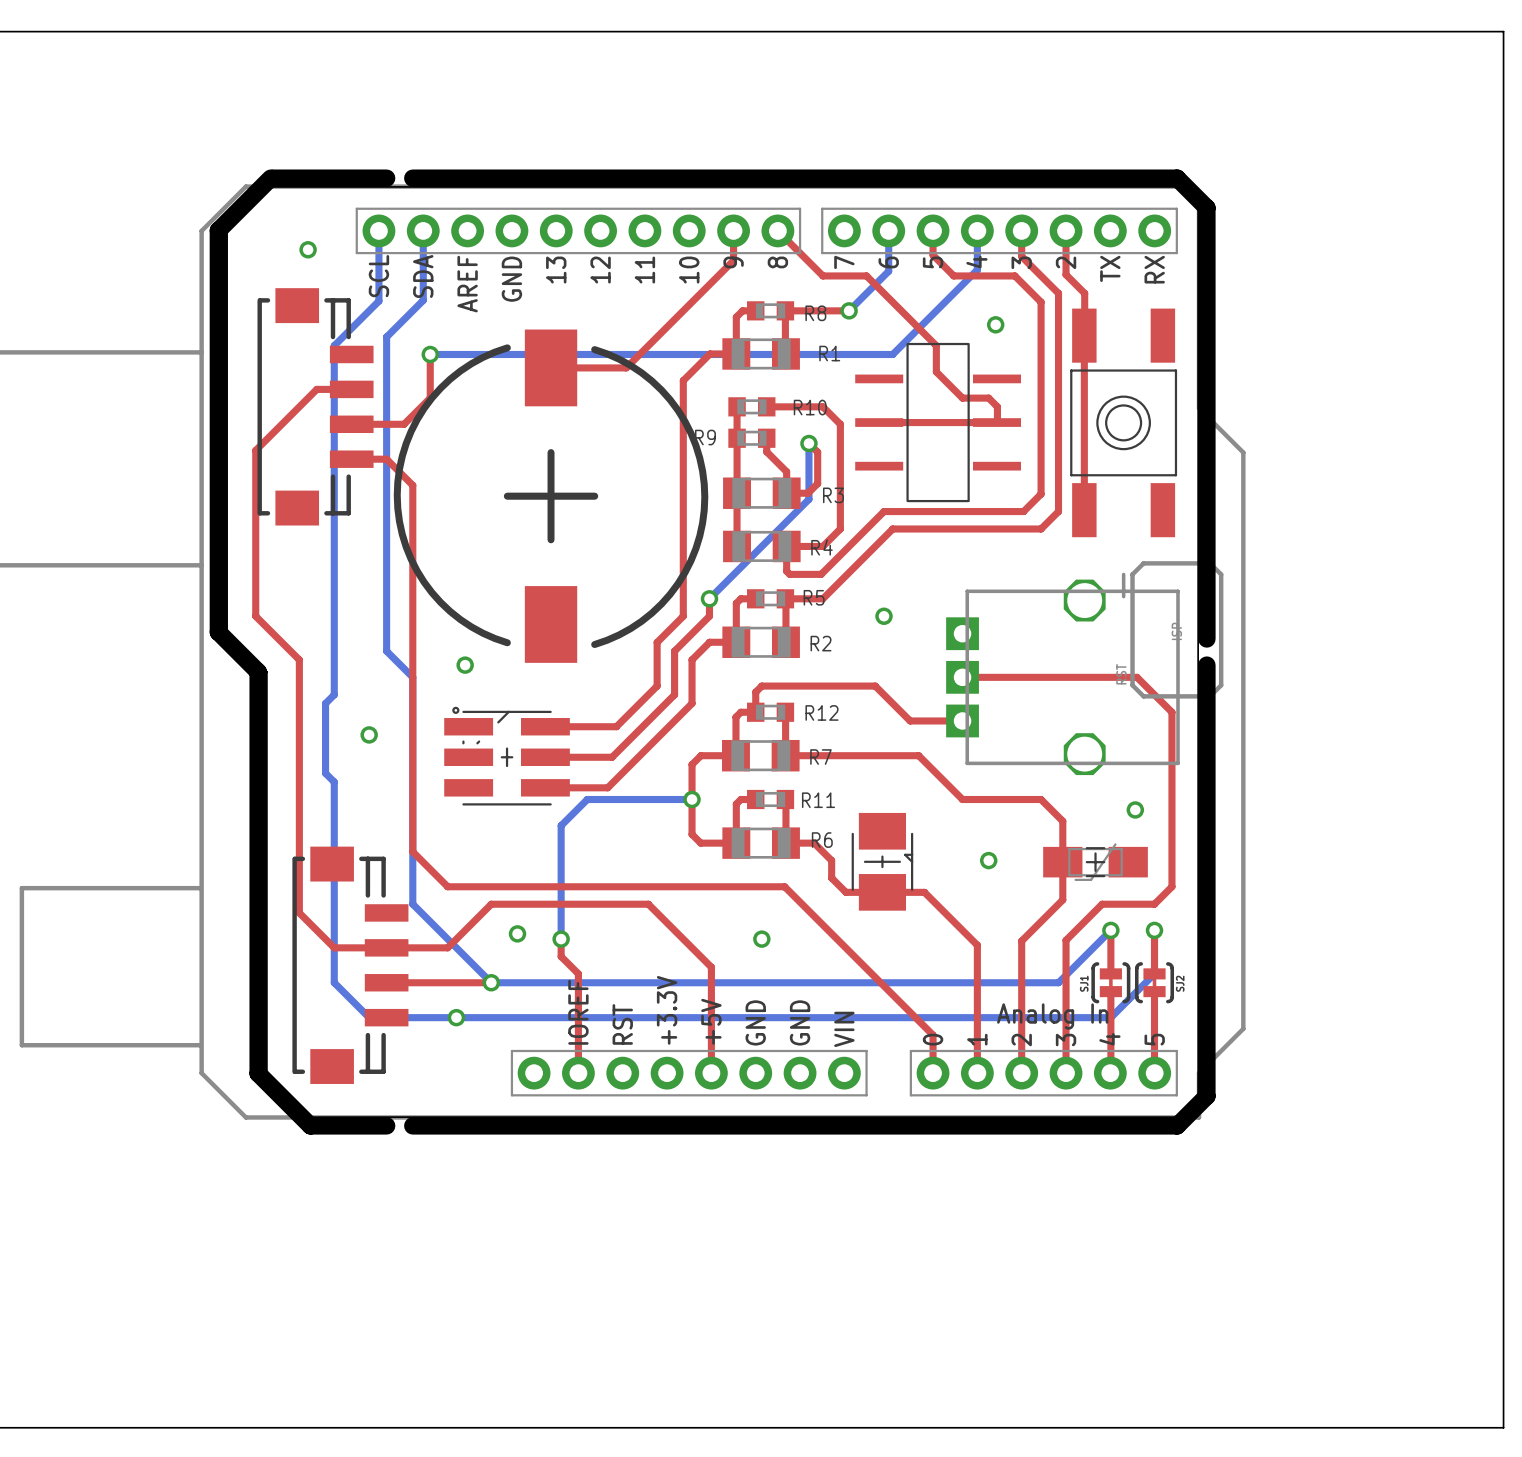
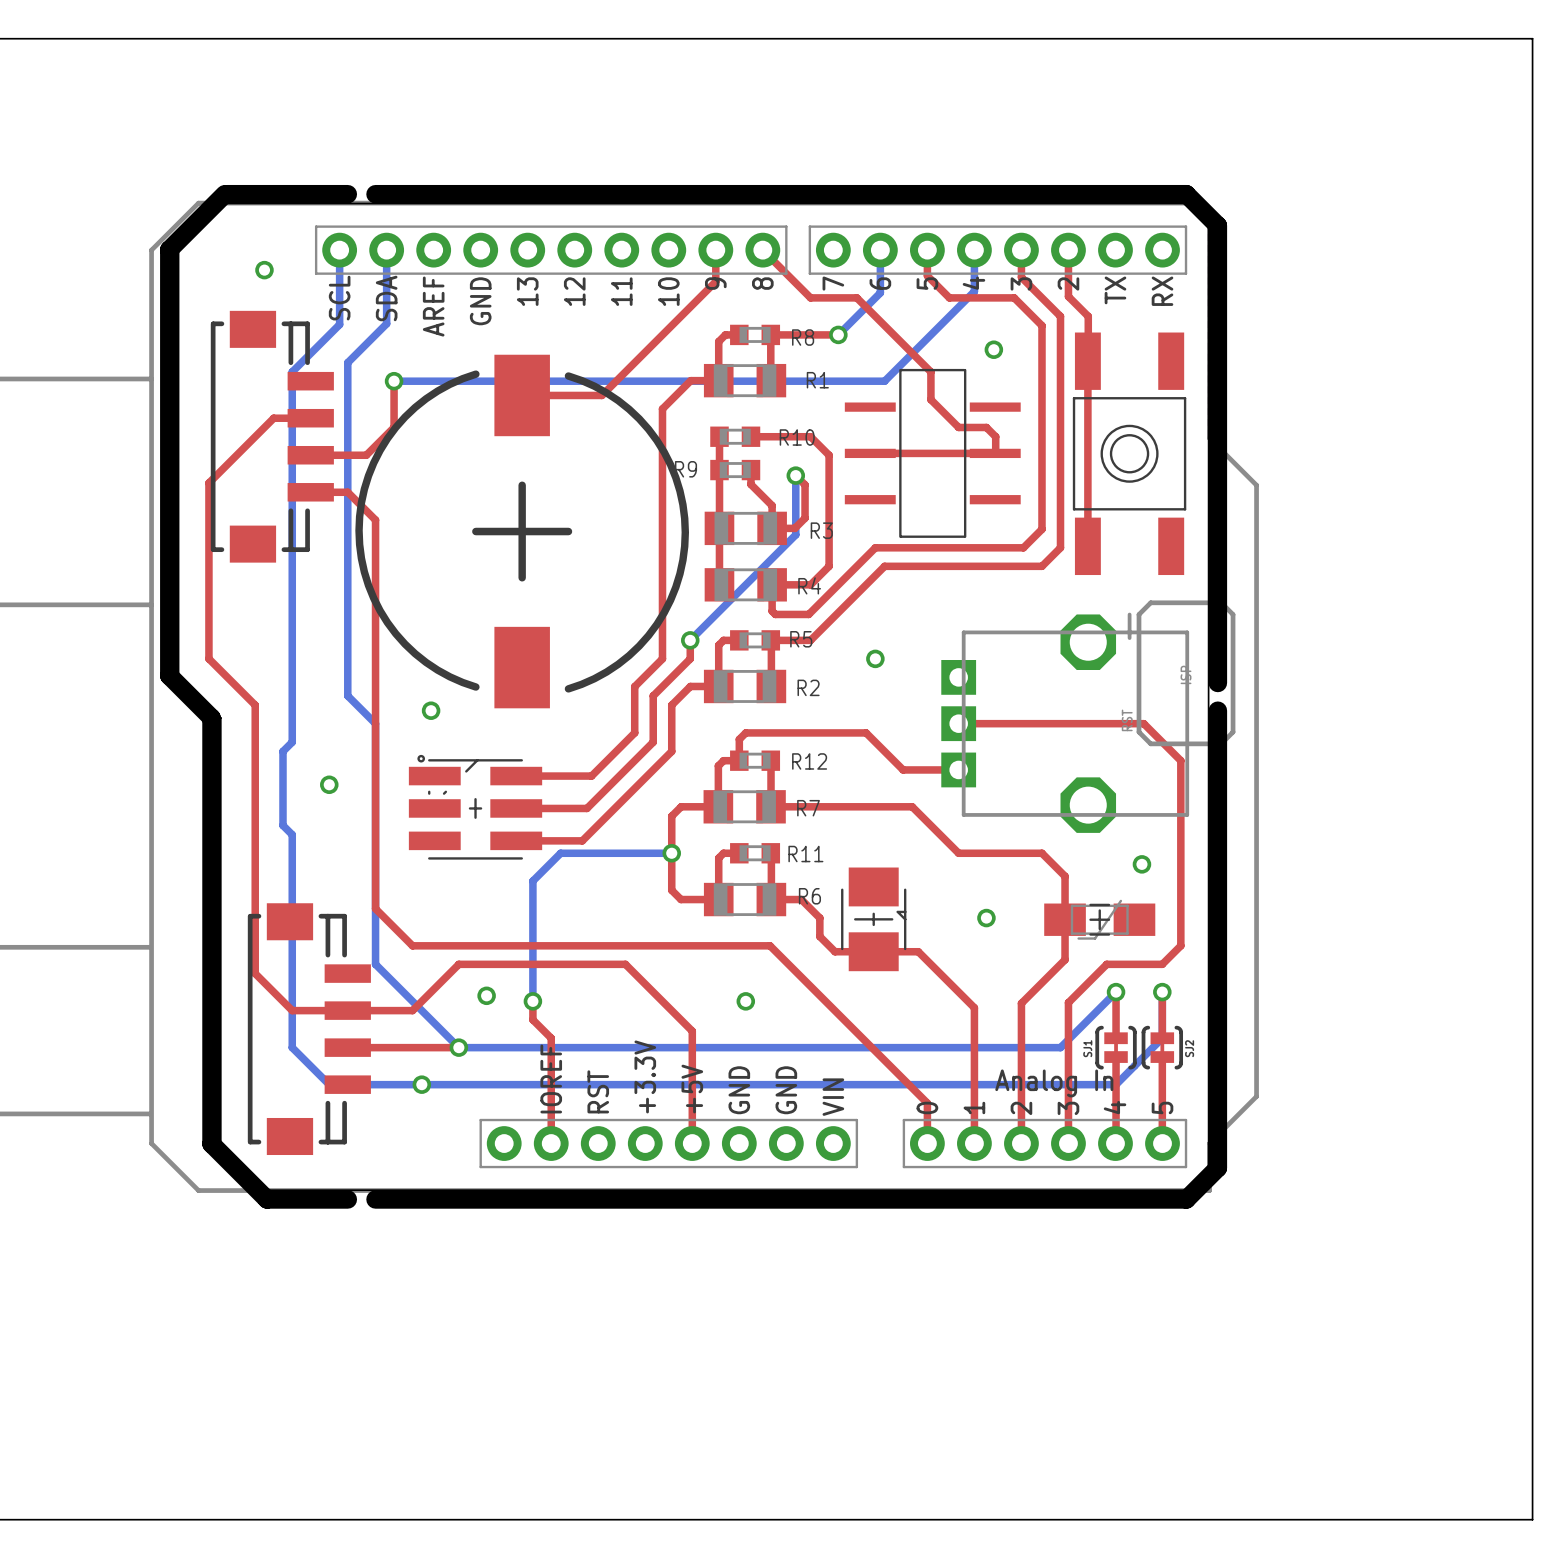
part footprint: [946, 579, 1180, 776] -> [941, 614, 1190, 833]

